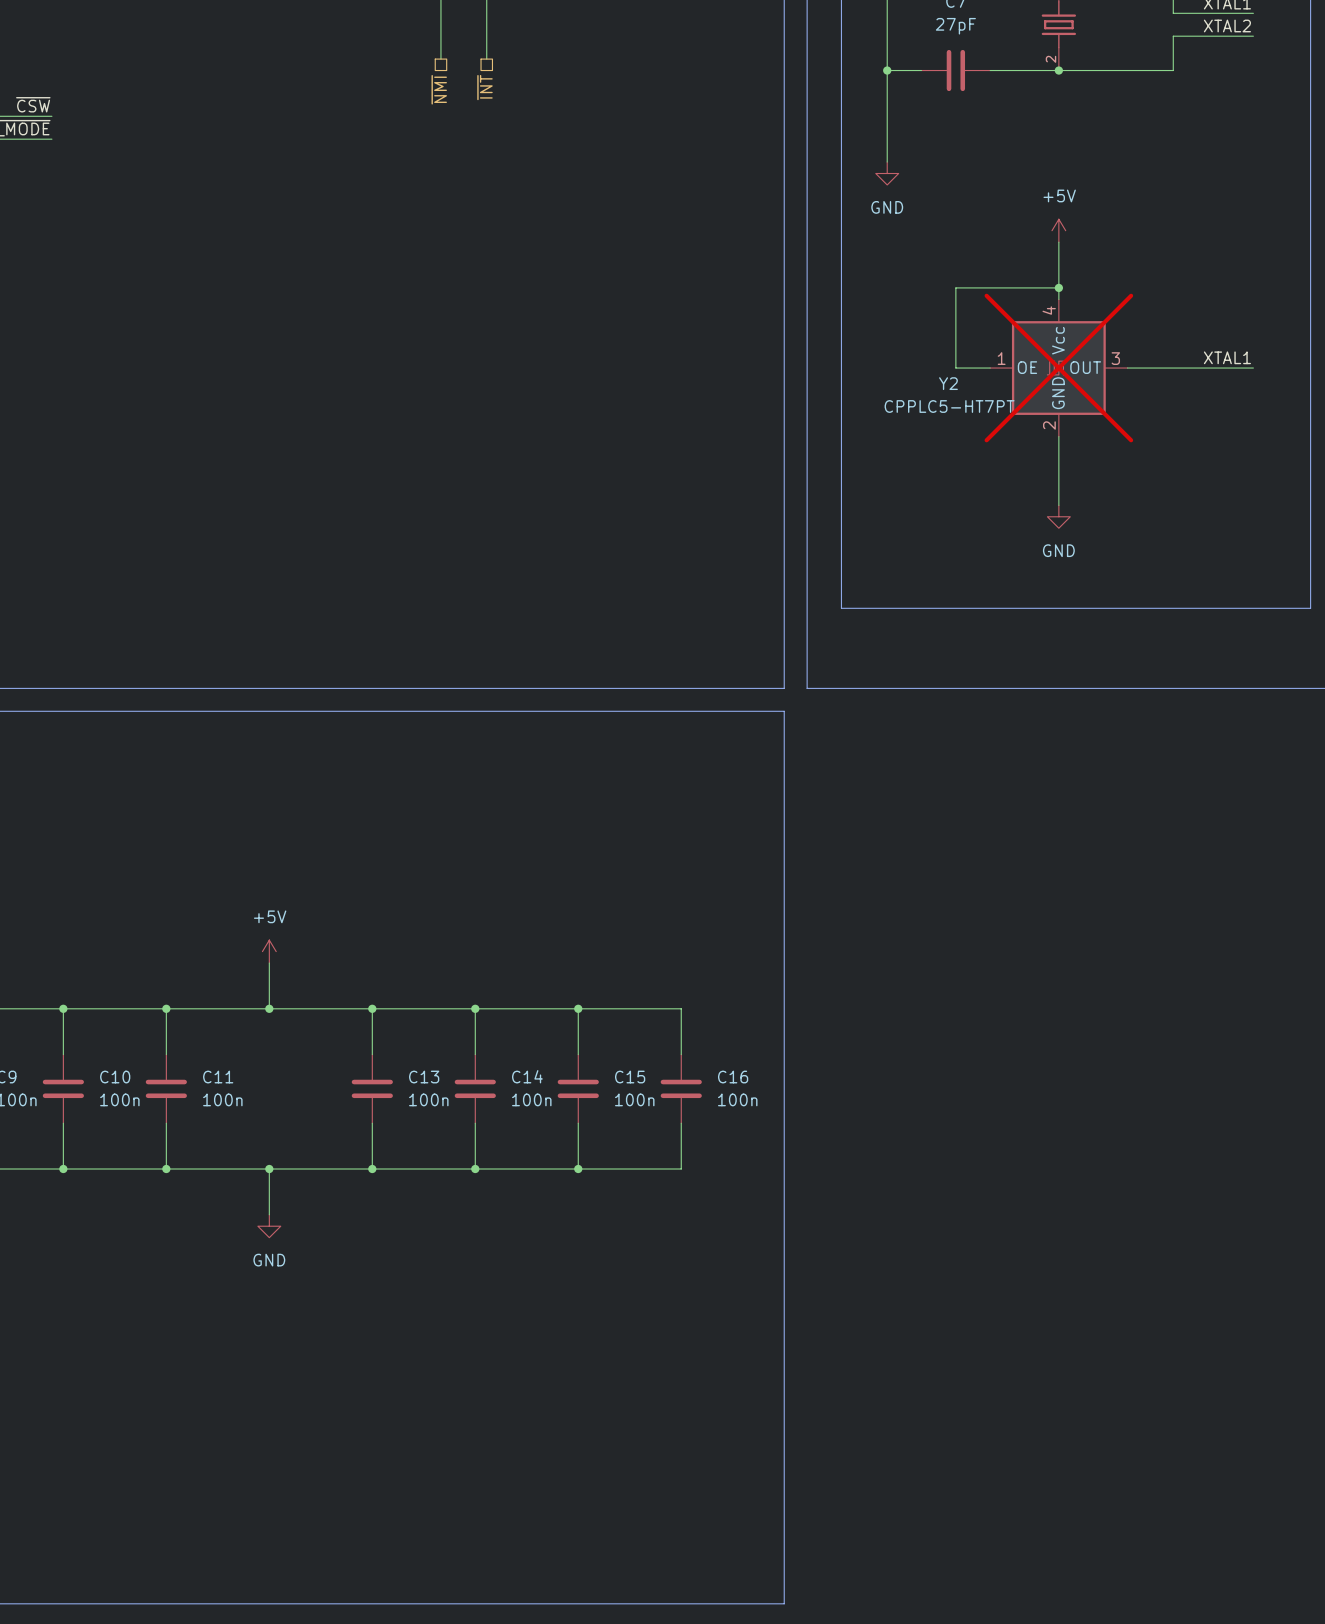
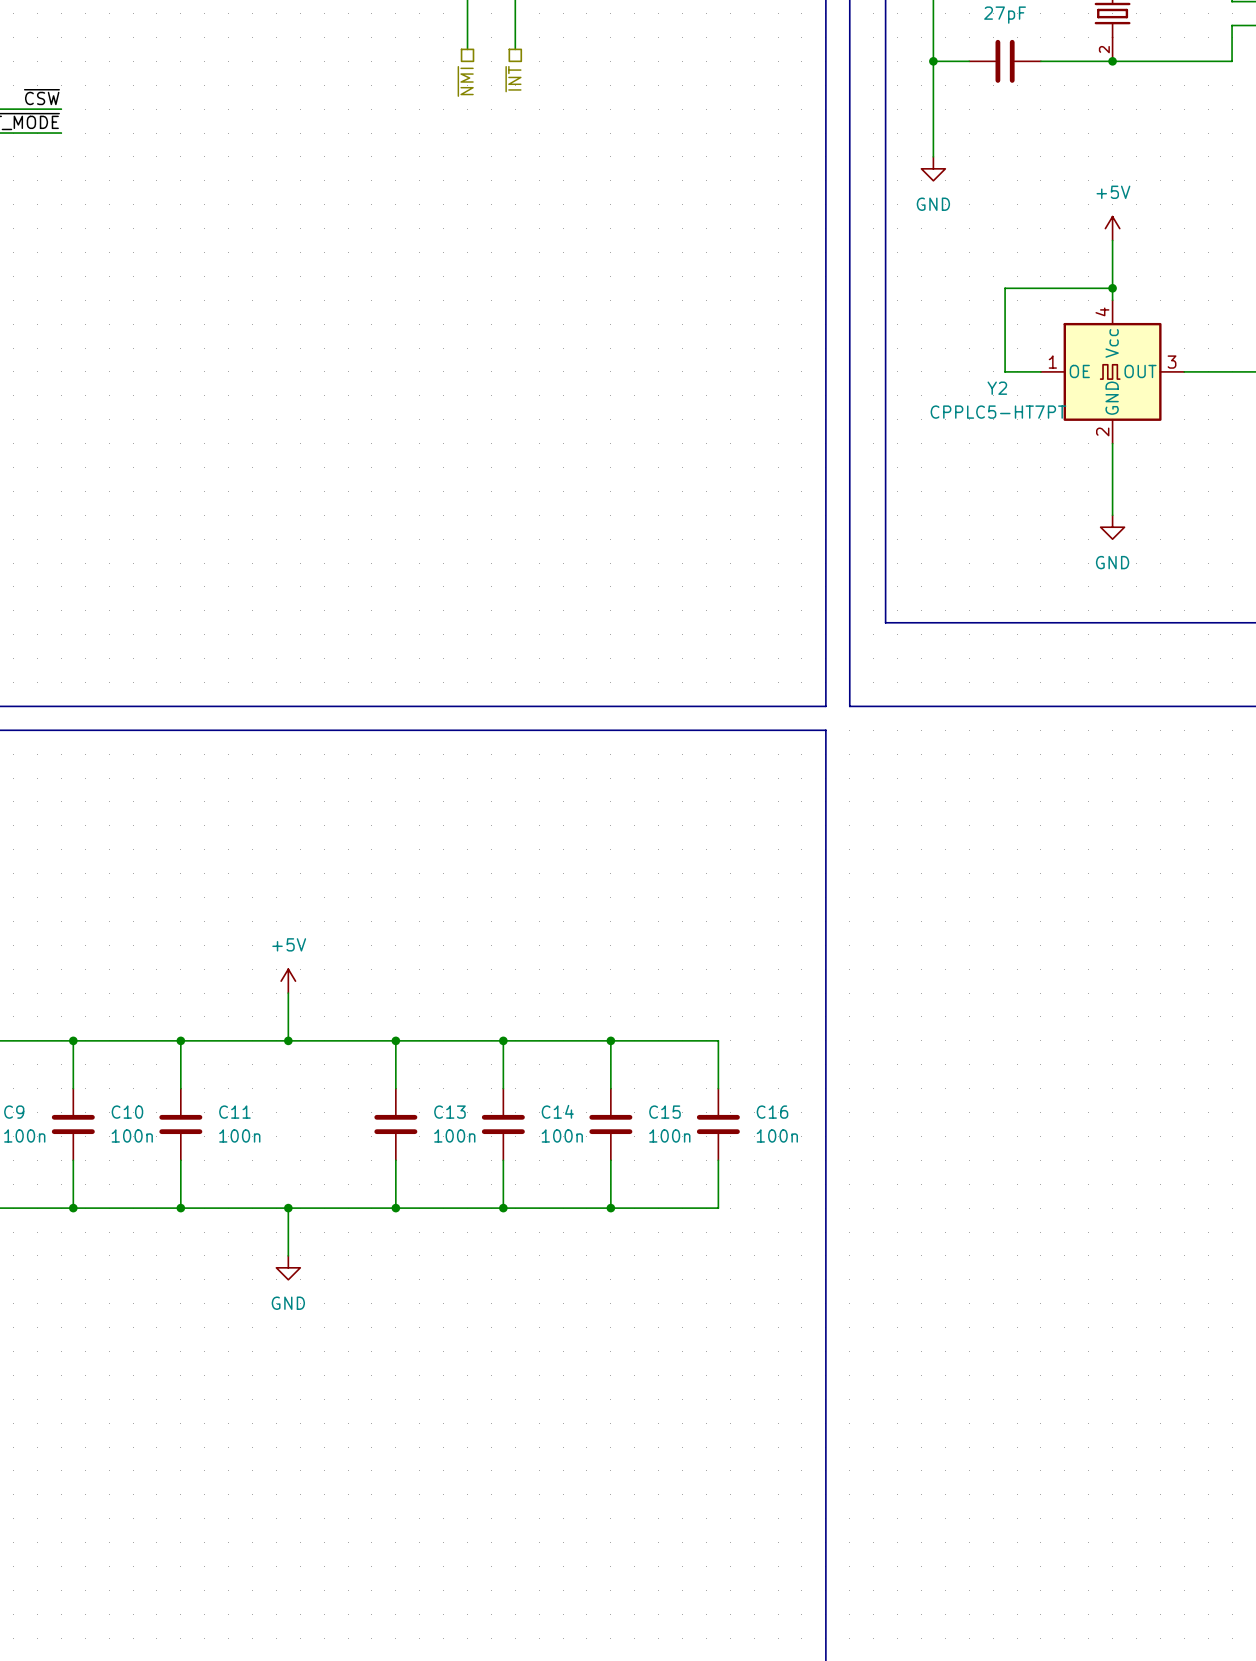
Y2 do-not-place cross: (1058, 368) -> none

